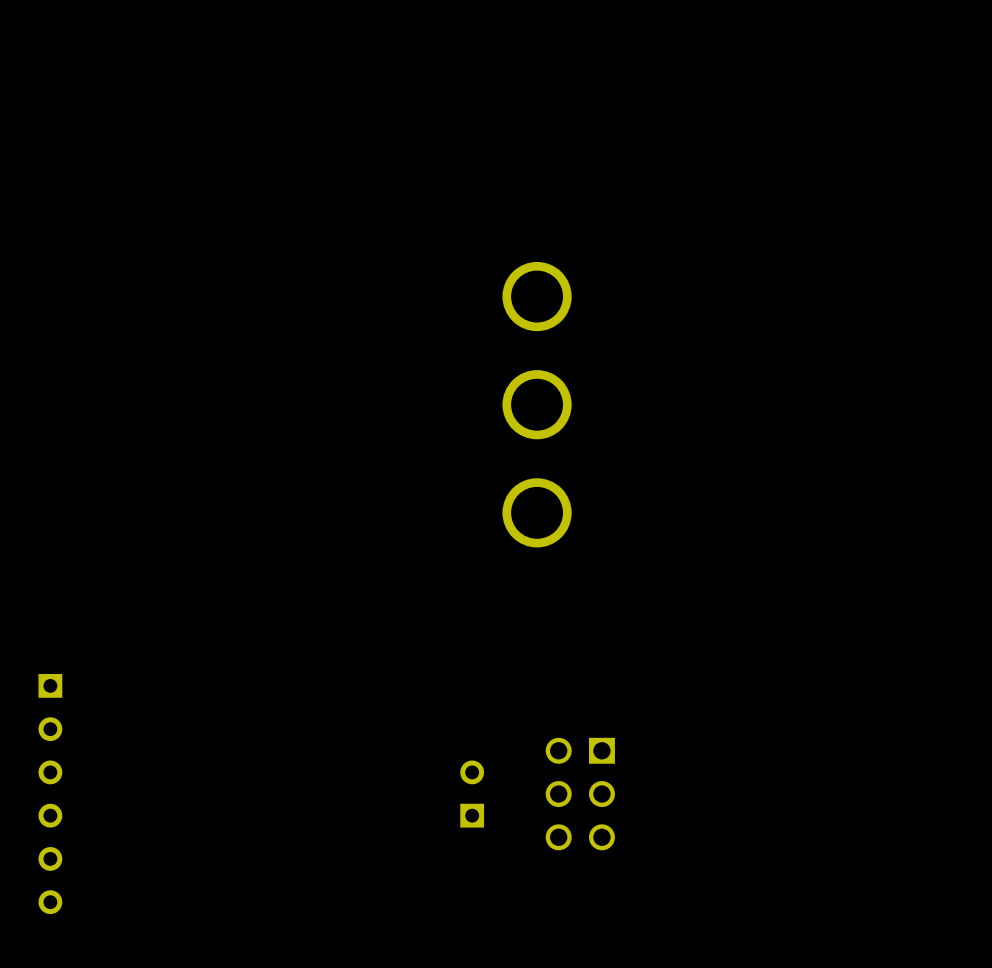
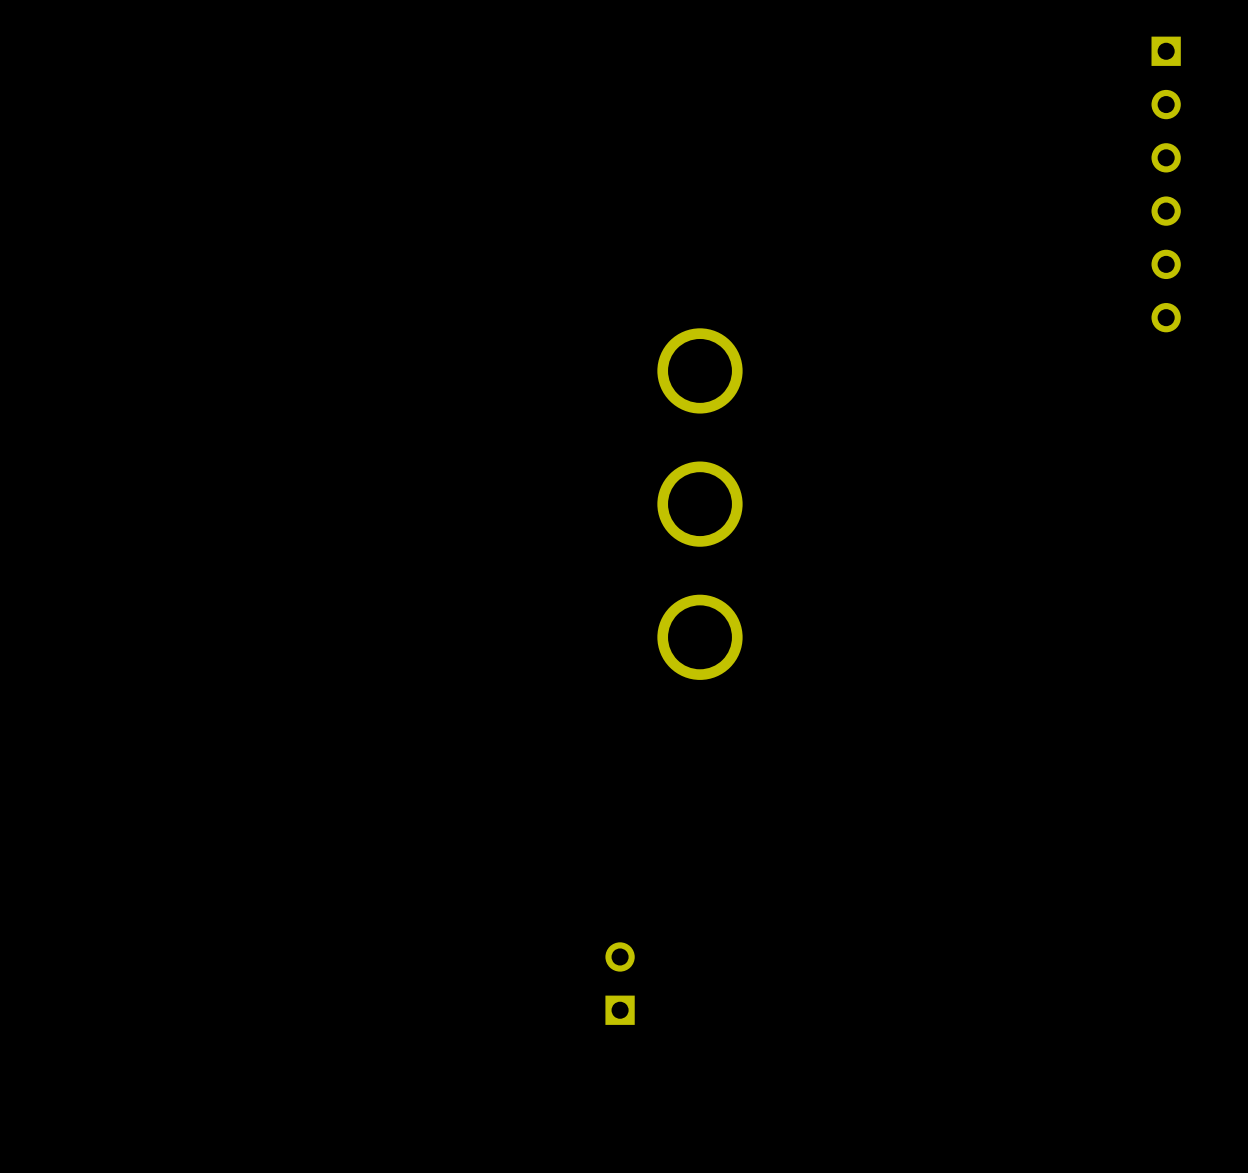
part: none -> (1166, 184)
part: (50, 794) -> none
part: (580, 794) -> none

